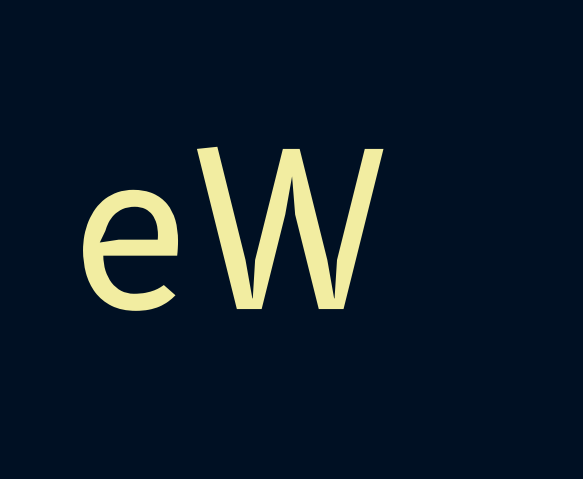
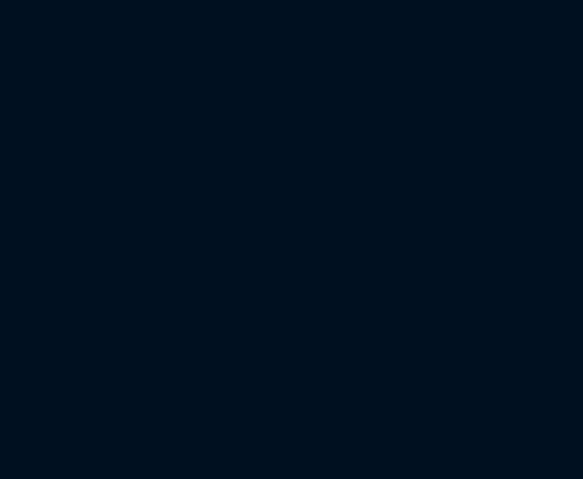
text: eW (233, 228) -> none

